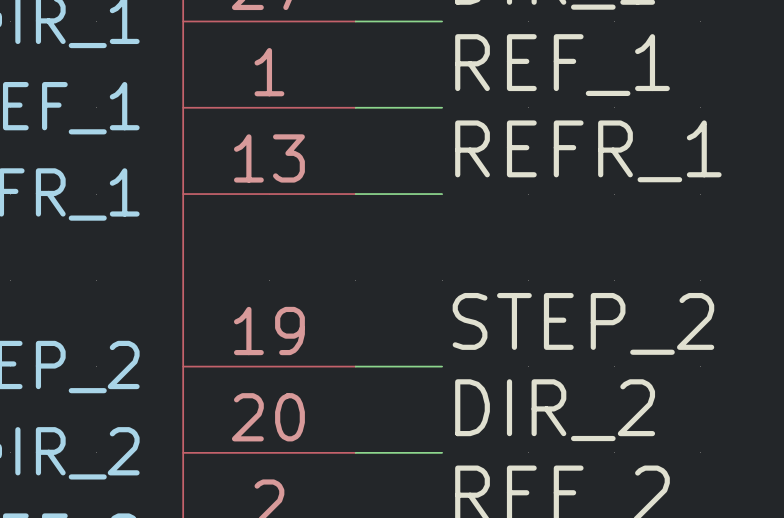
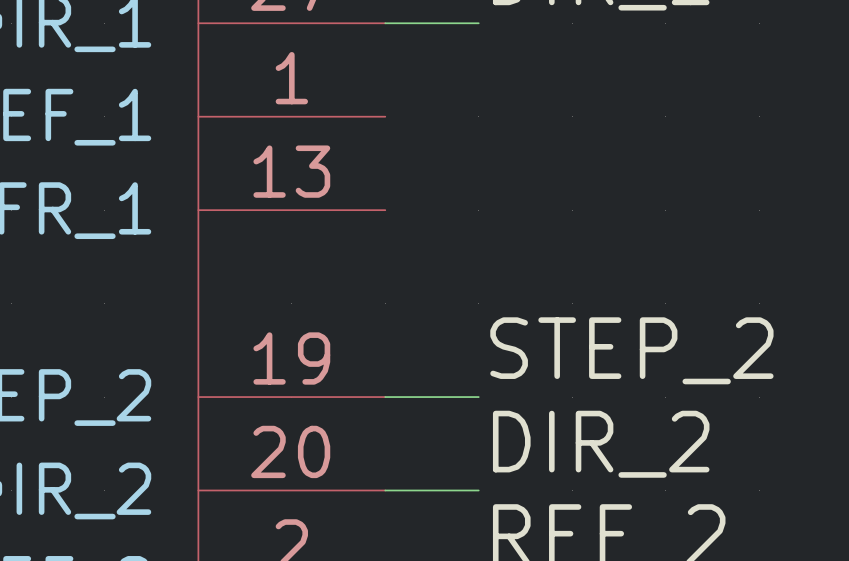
label: REF_1 (562, 65) -> none
wire: (355, 107) (442, 107) -> none
label: REFR_1 (588, 151) -> none
wire: (355, 194) (442, 194) -> none

